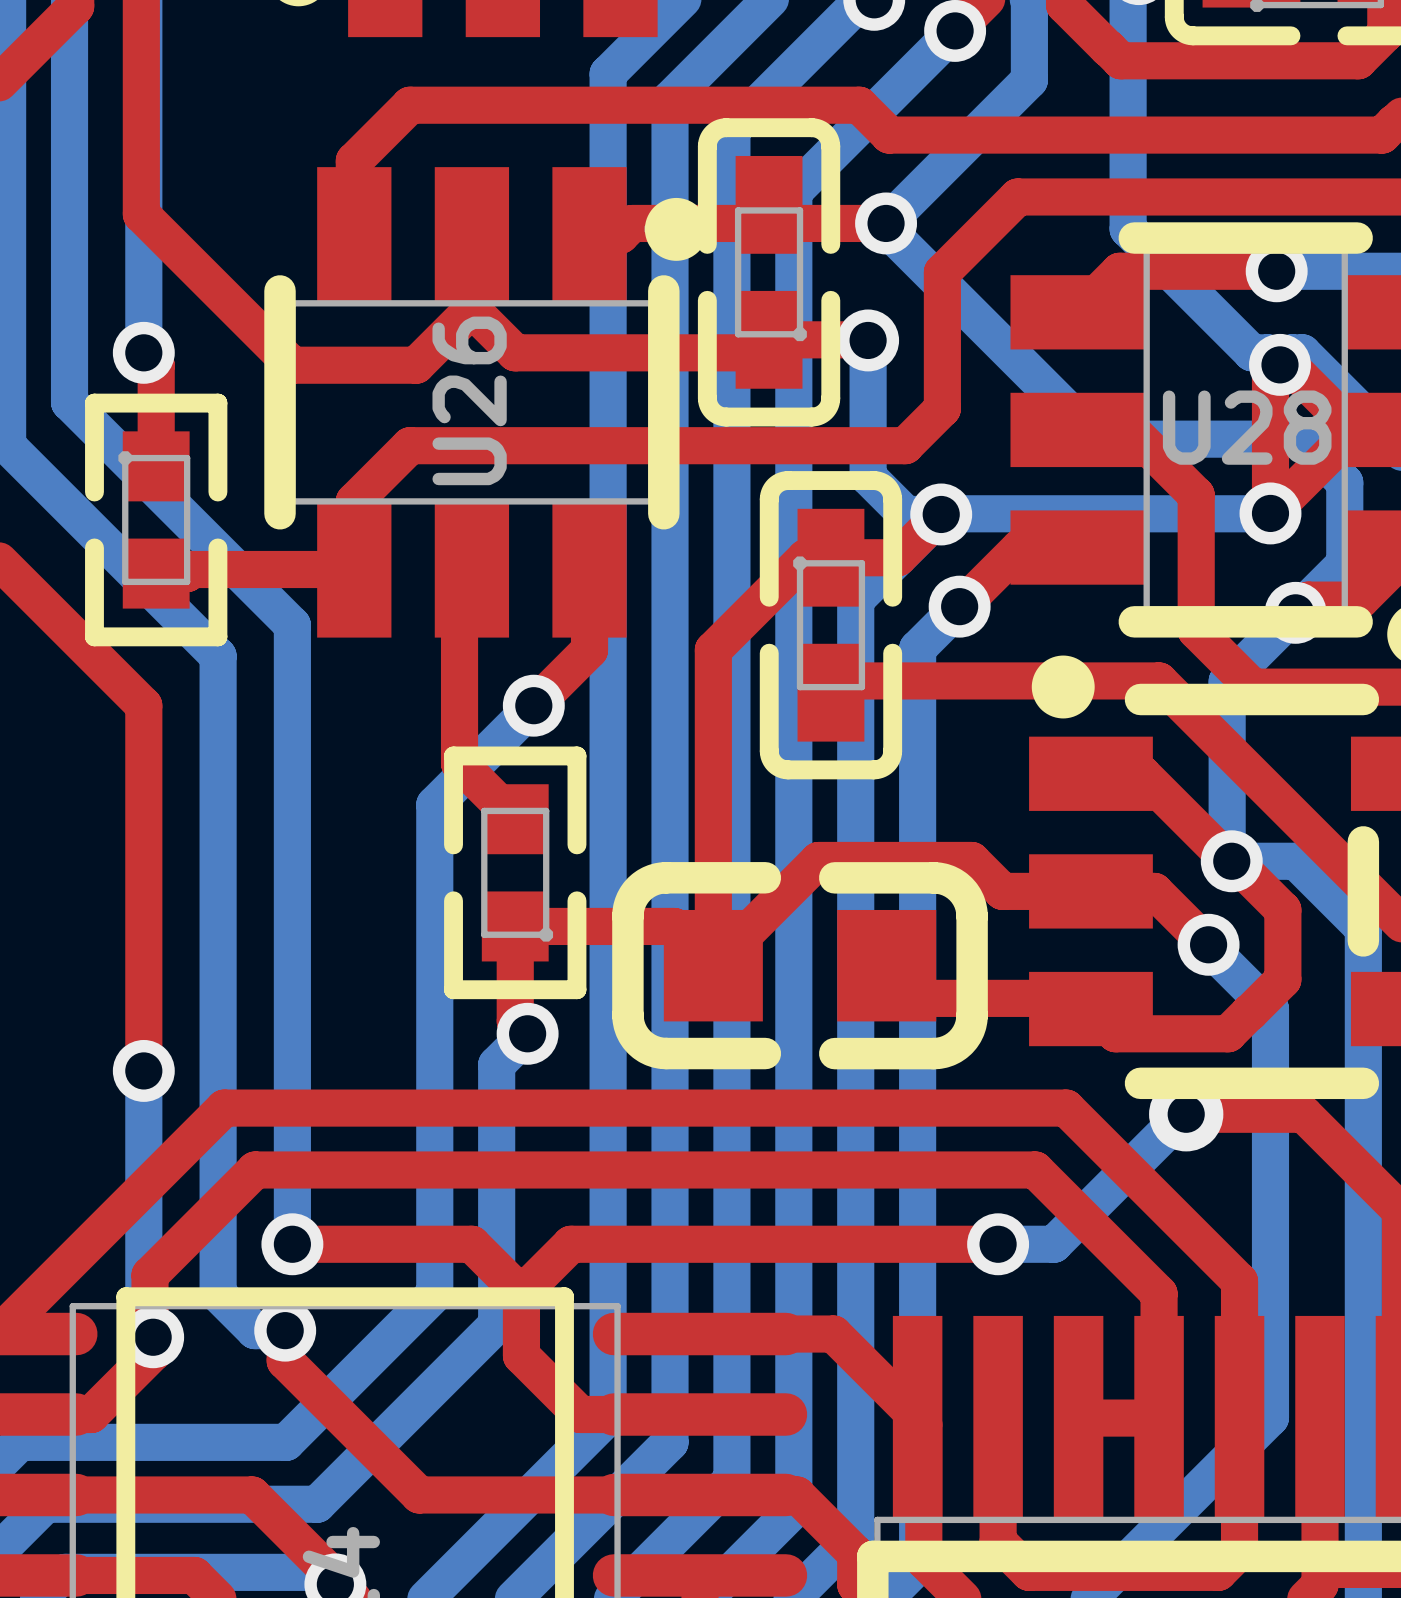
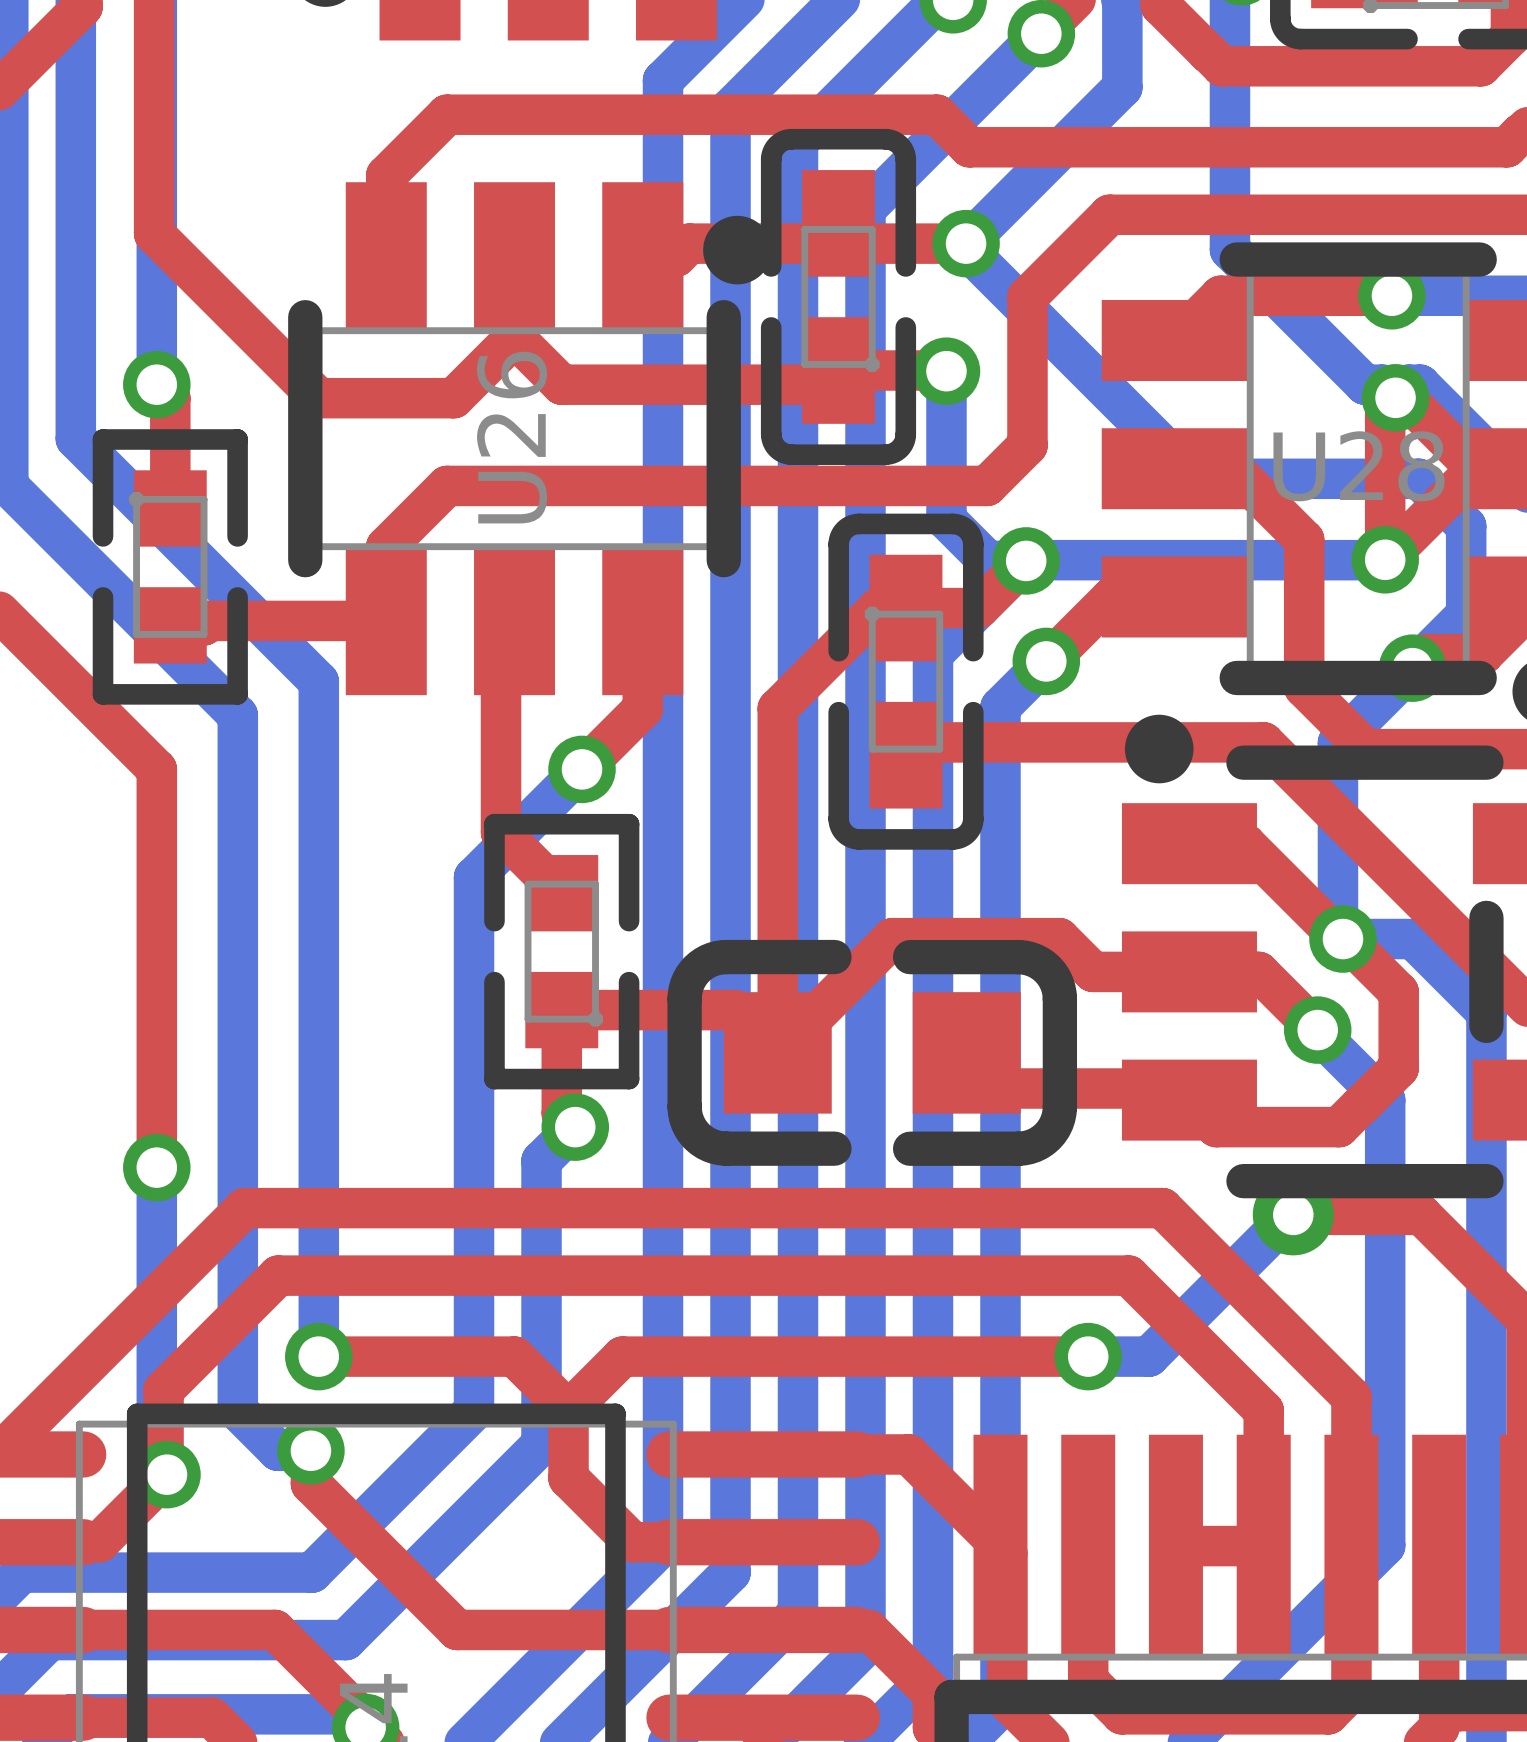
via position: (153, 1337) -> (166, 1474)

